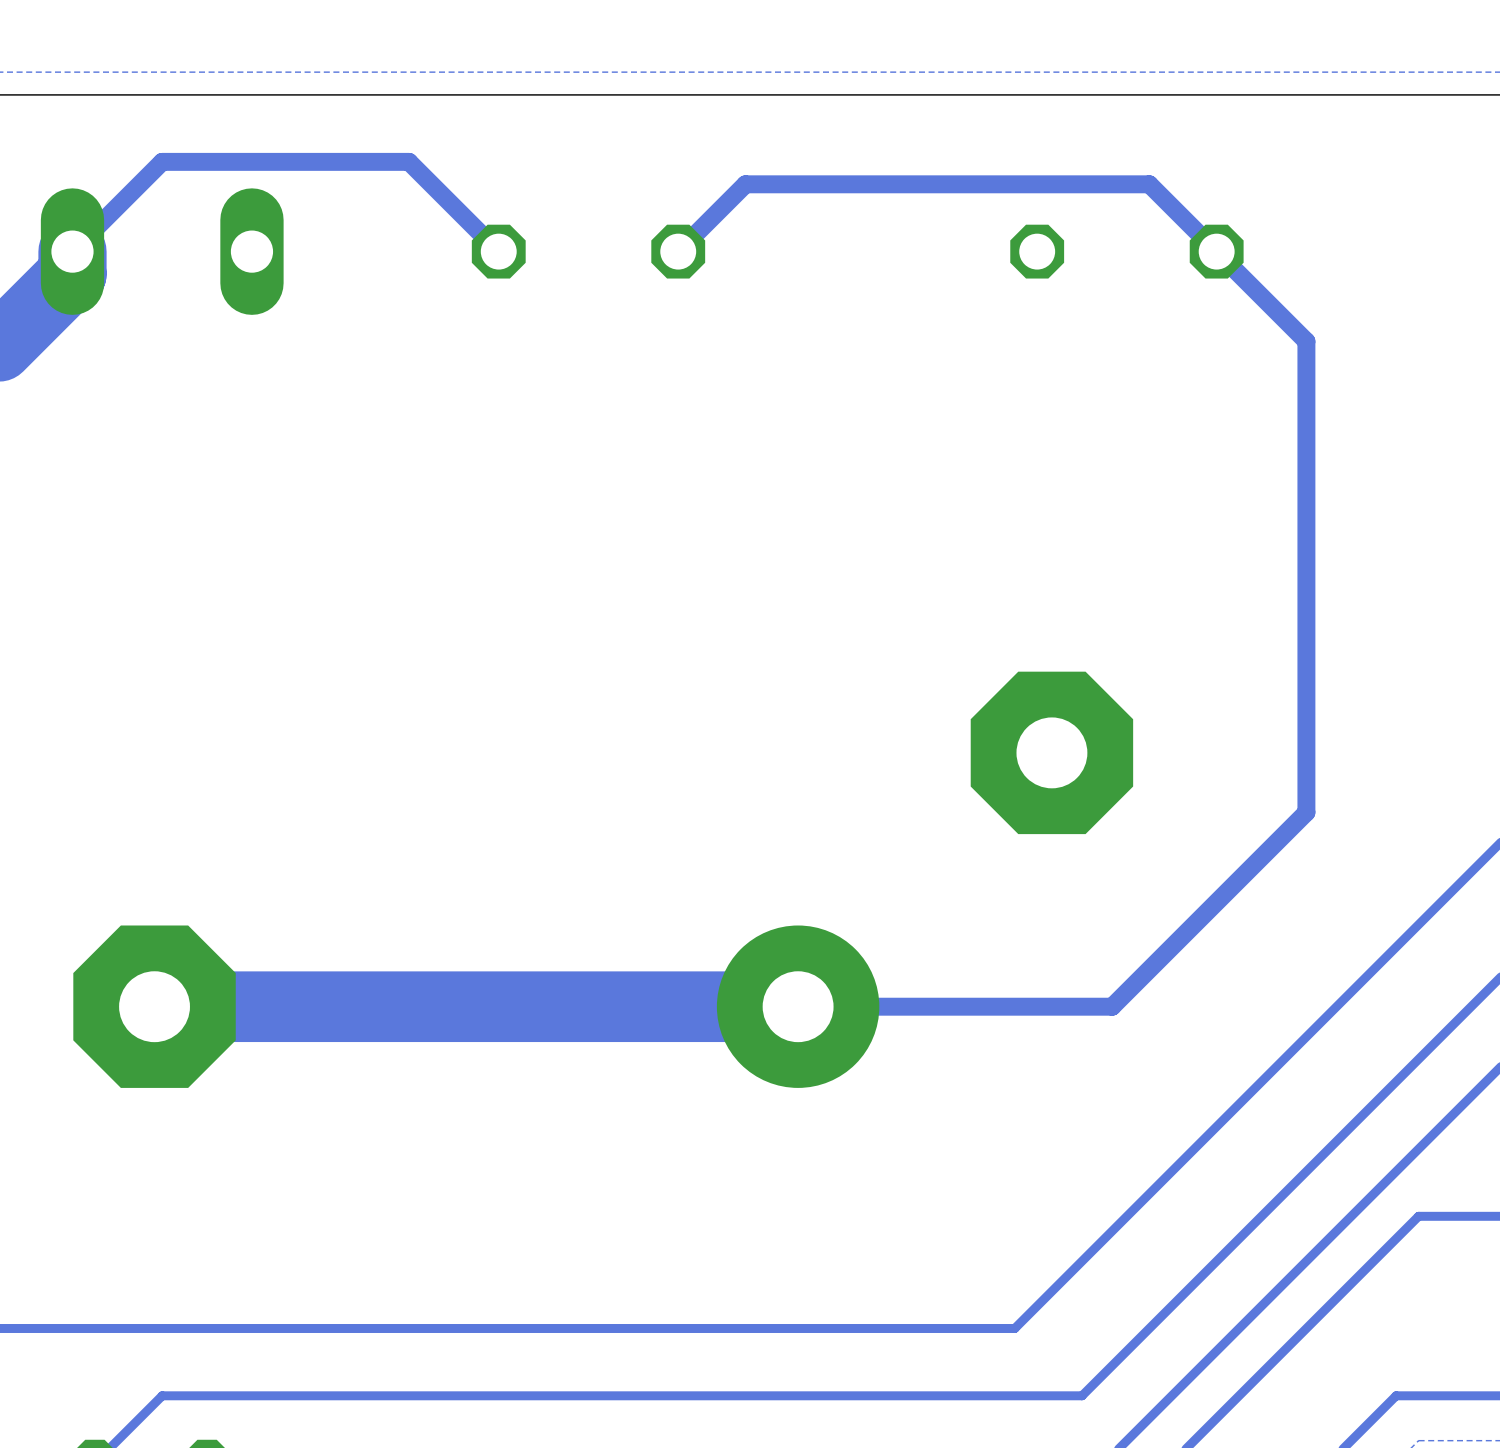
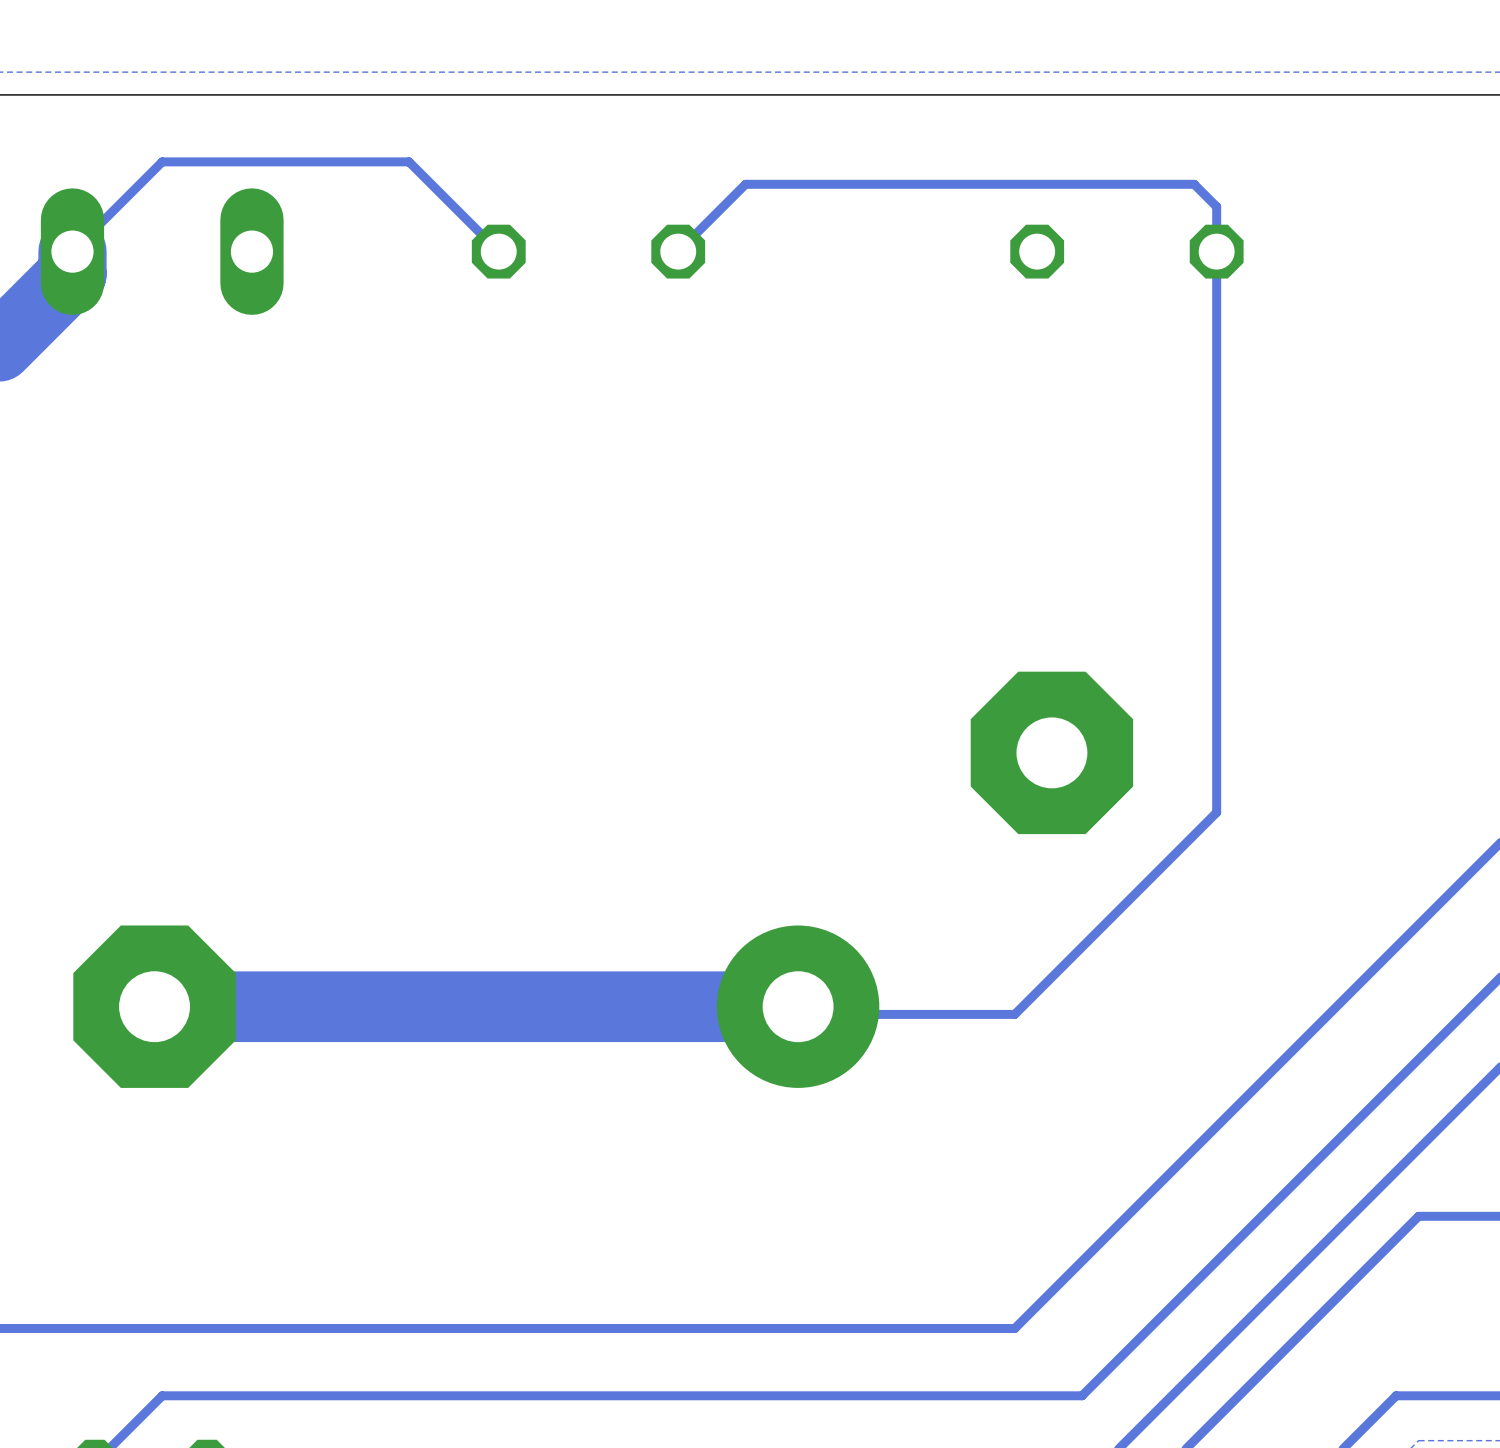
track: (1149, 184) (1306, 341) (1306, 812) (1112, 1006) (798, 1006) -> (1149, 184) (1194, 184) (1216, 206) (1216, 812) (1014, 1014) (626, 1014) (798, 1006)
track width: thick (1149, 184) (745, 184) (678, 251) -> thin (1149, 184) (745, 184) (678, 251)
track width: thick (498, 251) (409, 161) (162, 161) (72, 251) -> thin (498, 251) (409, 161) (162, 161) (72, 251)

